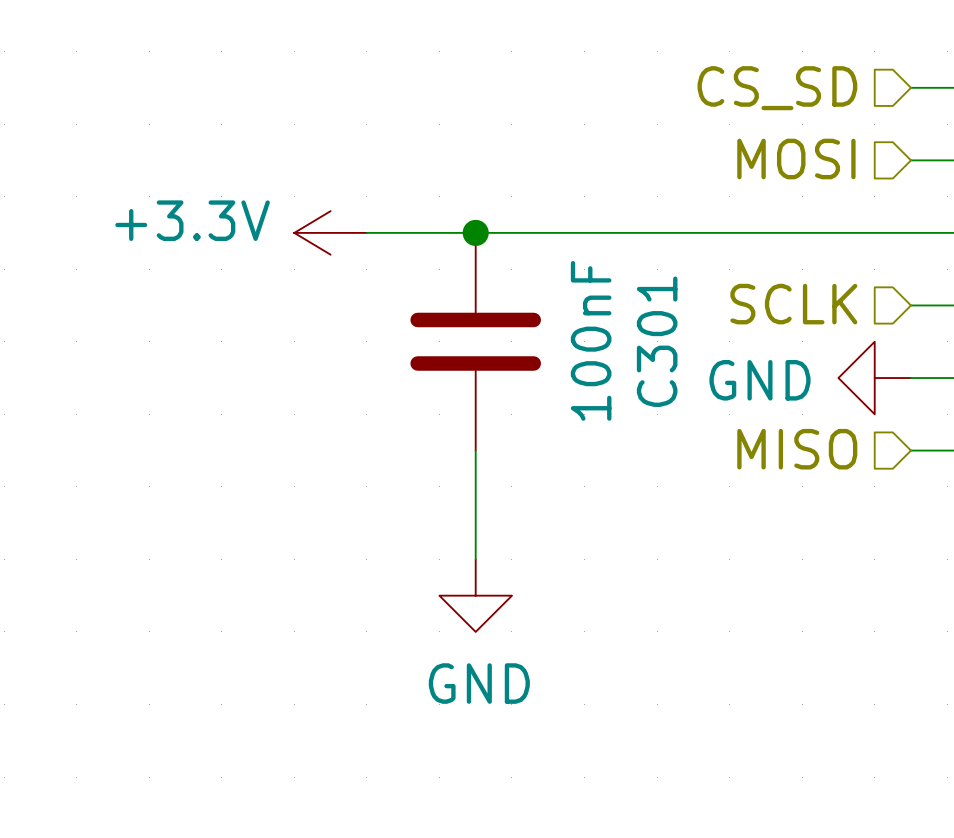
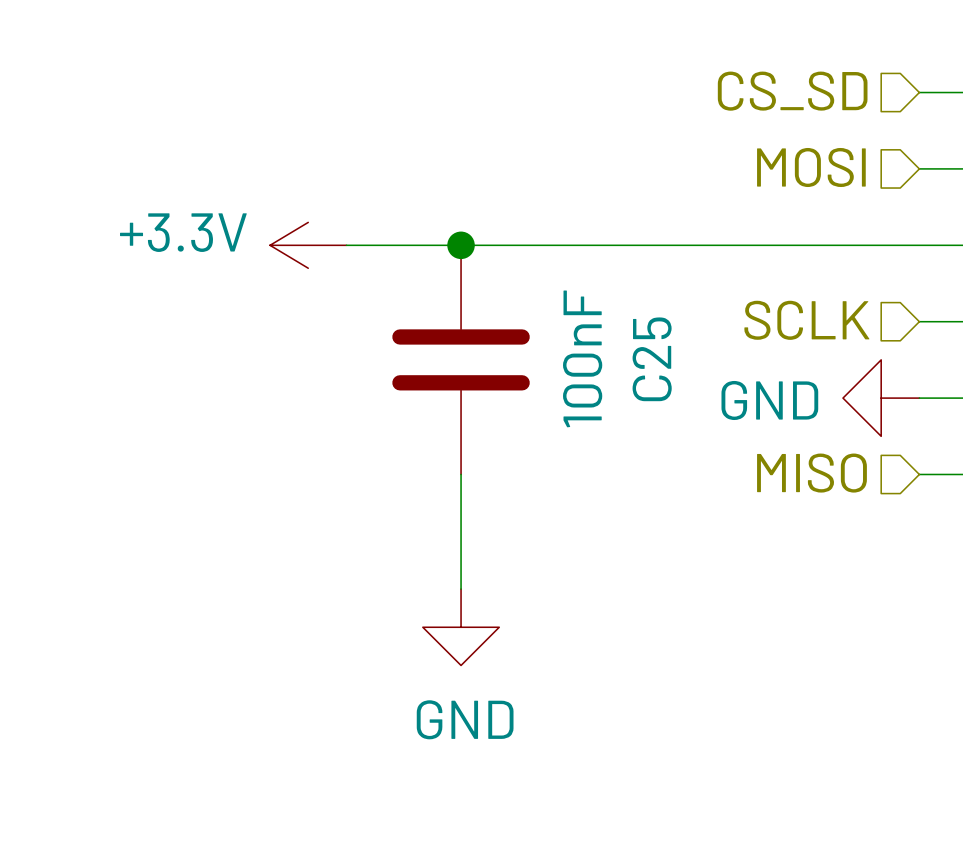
C301 name: C301 (657, 341) -> C25 (652, 359)

